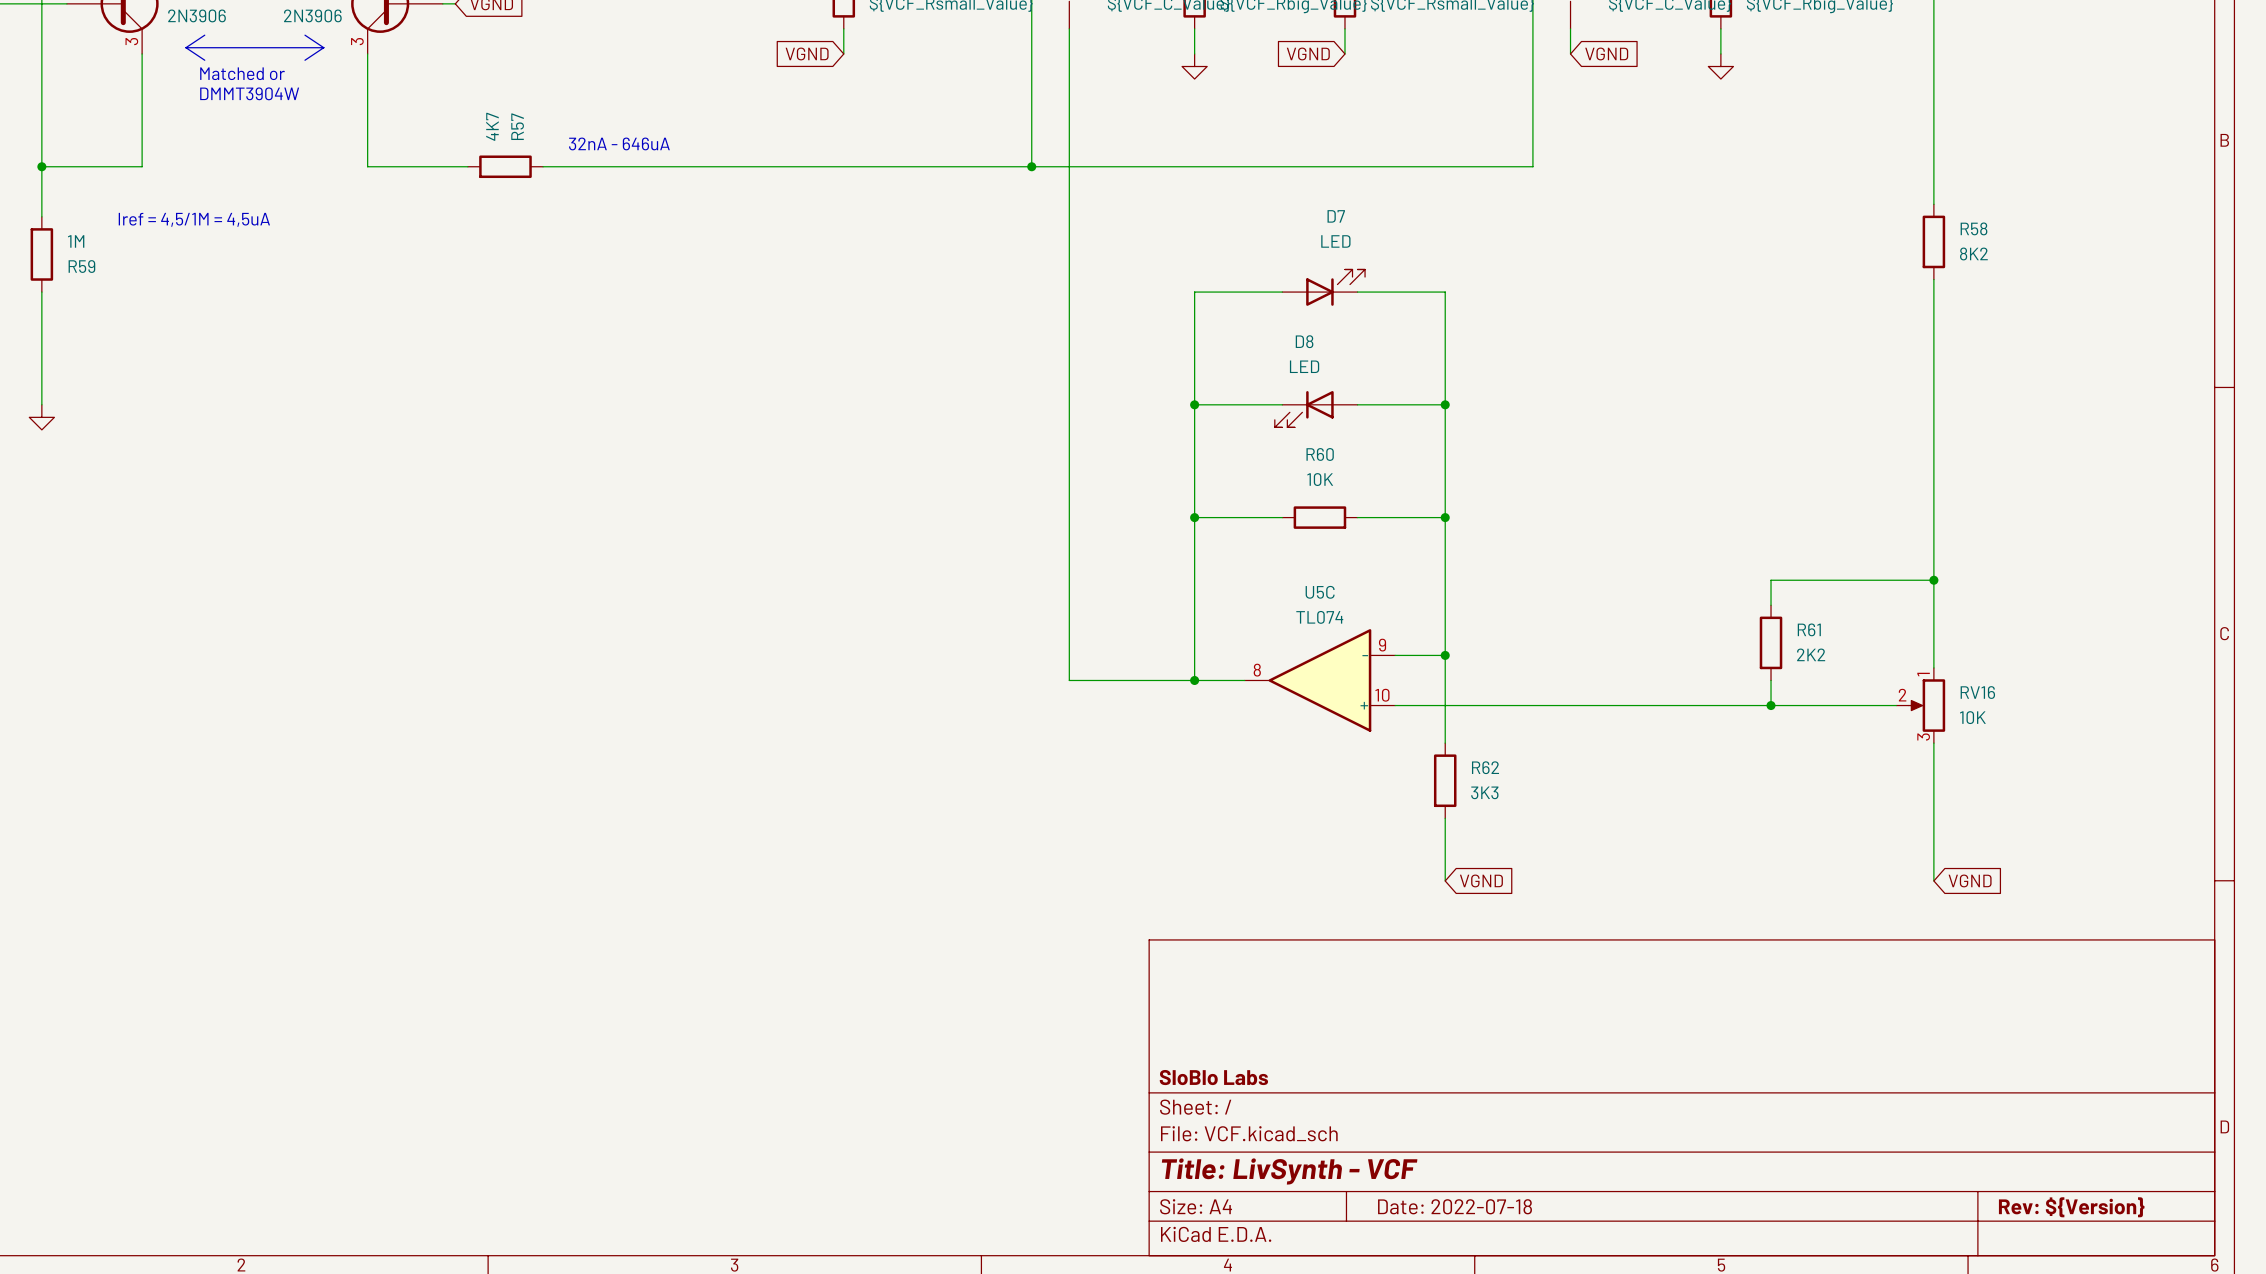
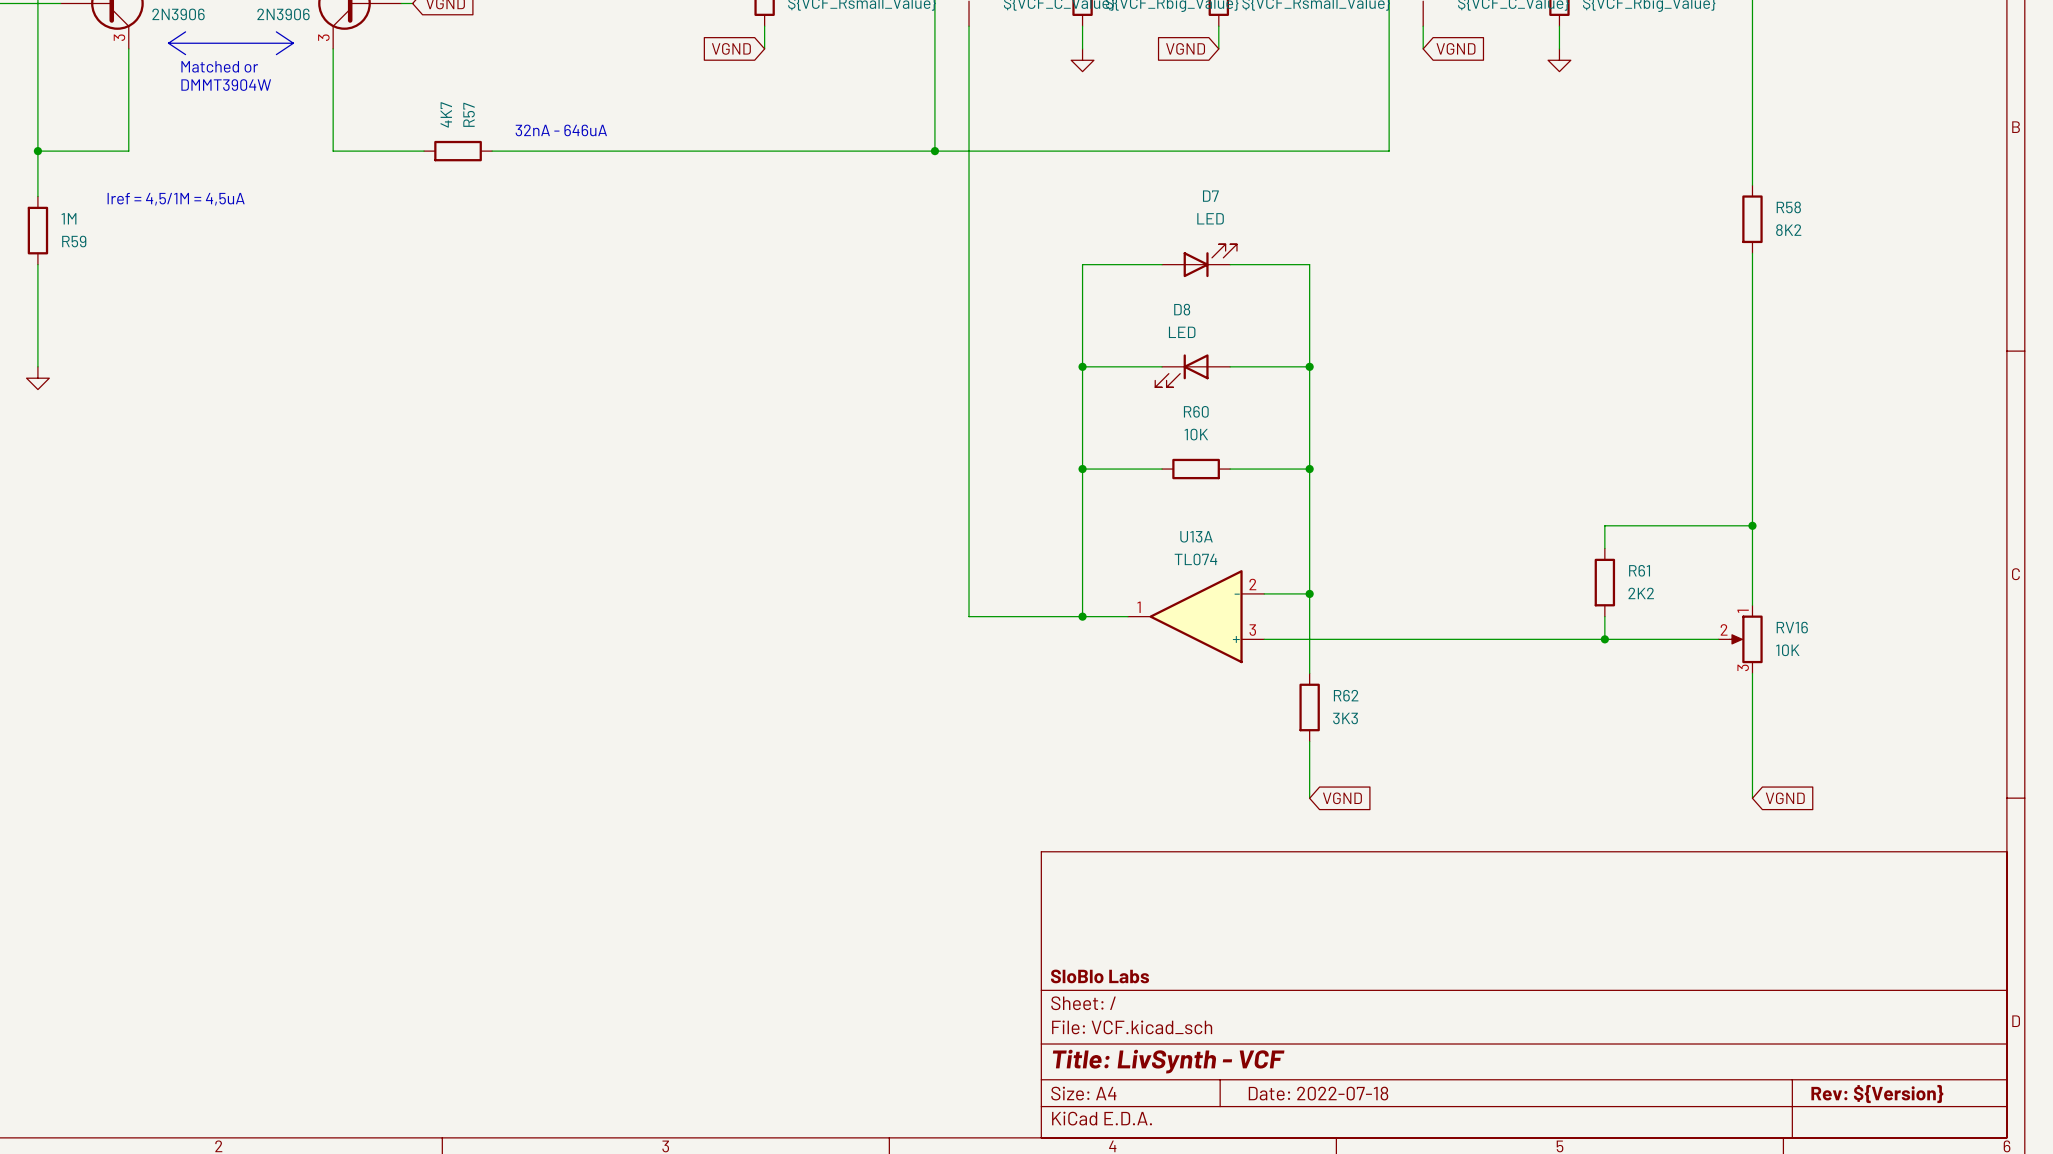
U5C name: U5C (1320, 592) -> U13A (1196, 536)
U5C pin number: 9 (1382, 645) -> 2 (1252, 584)
U5C pin number: 8 (1257, 670) -> 1 (1139, 607)
U5C pin number: 10 (1382, 695) -> 3 (1252, 630)

